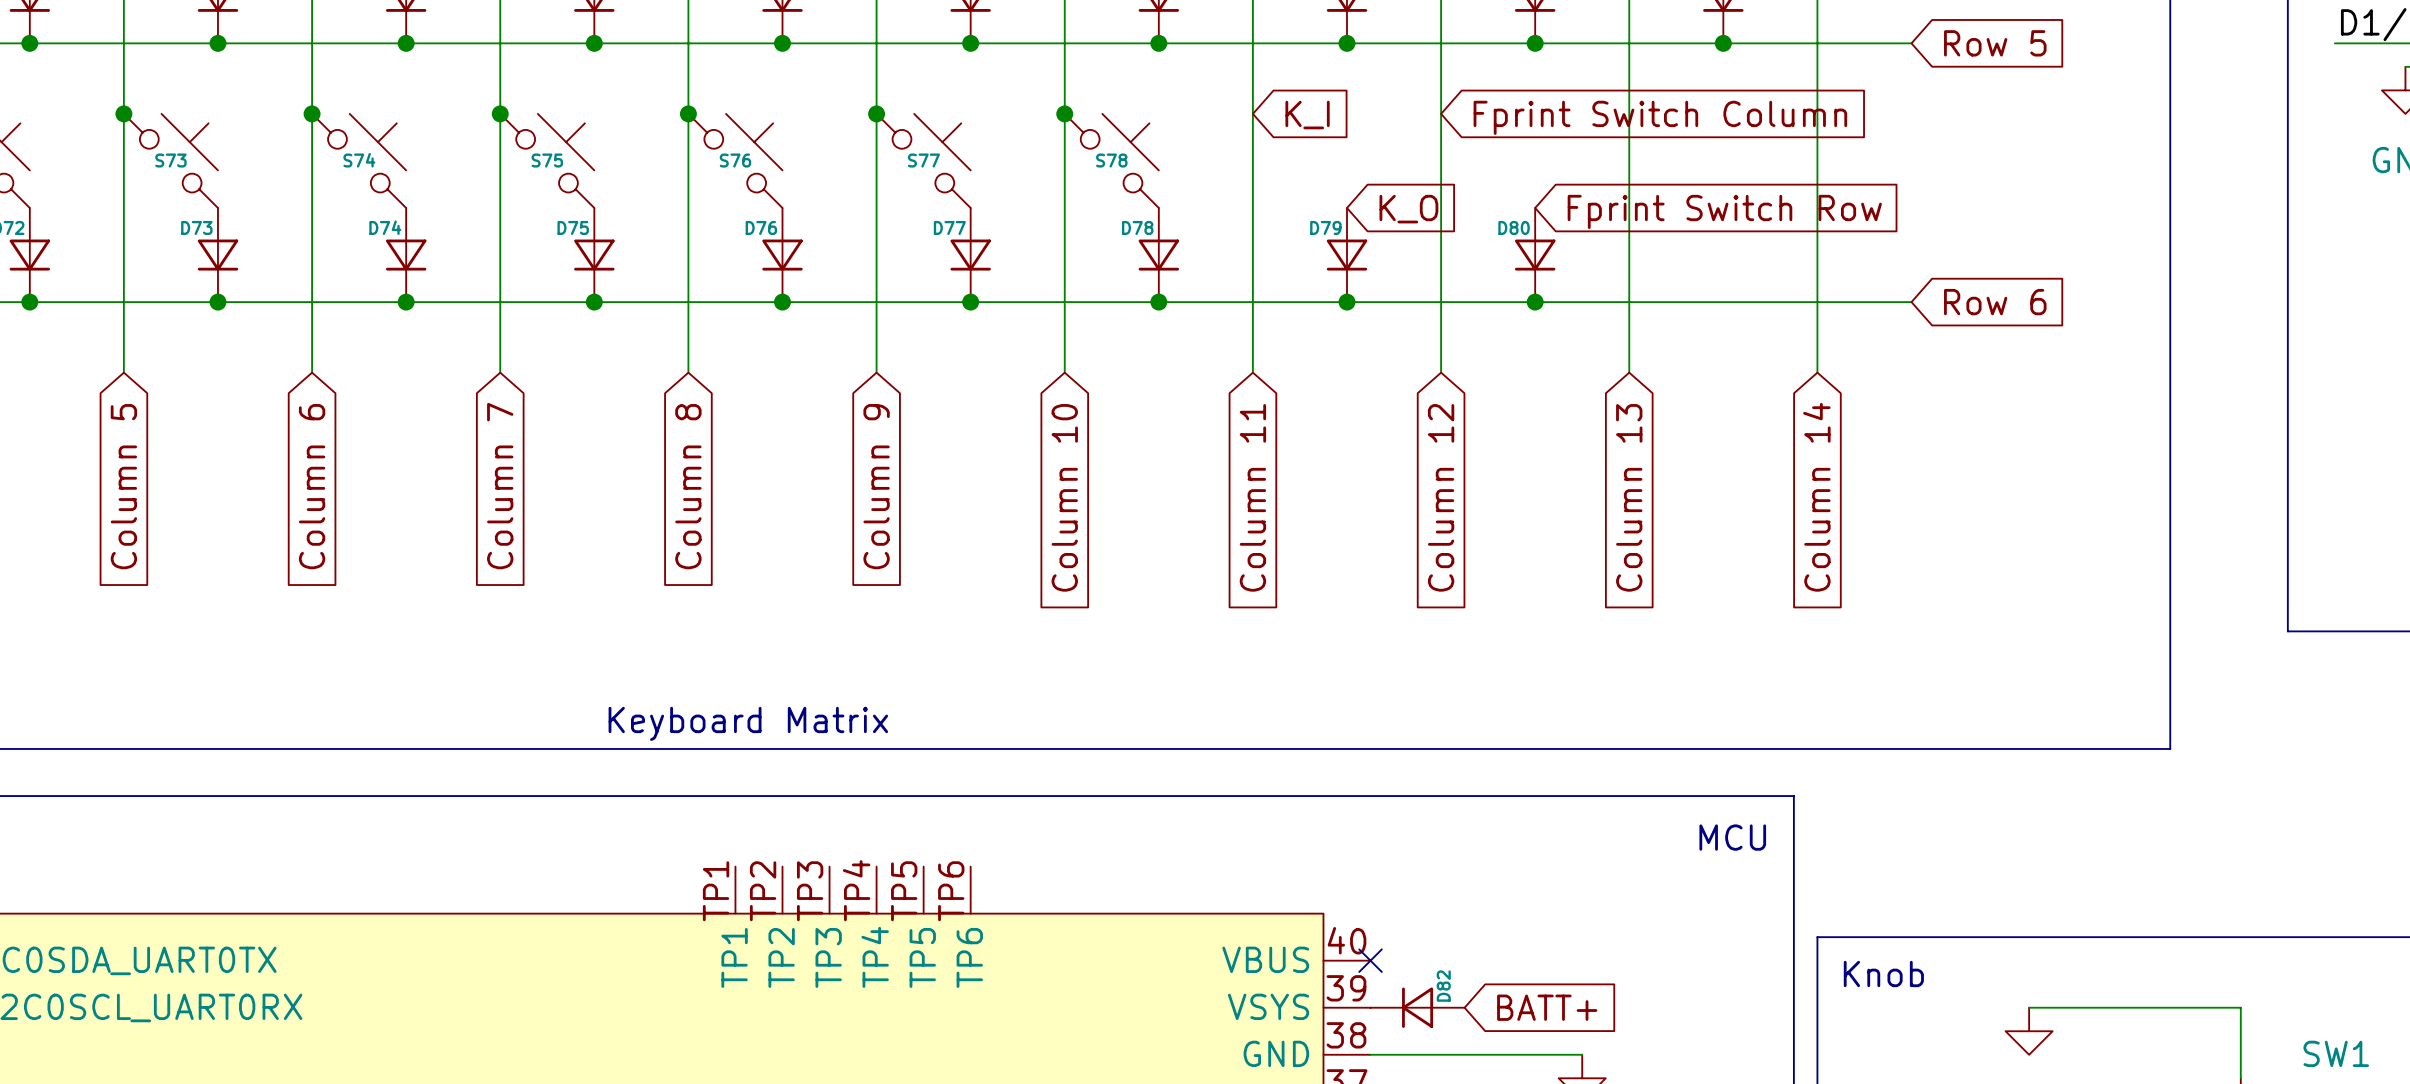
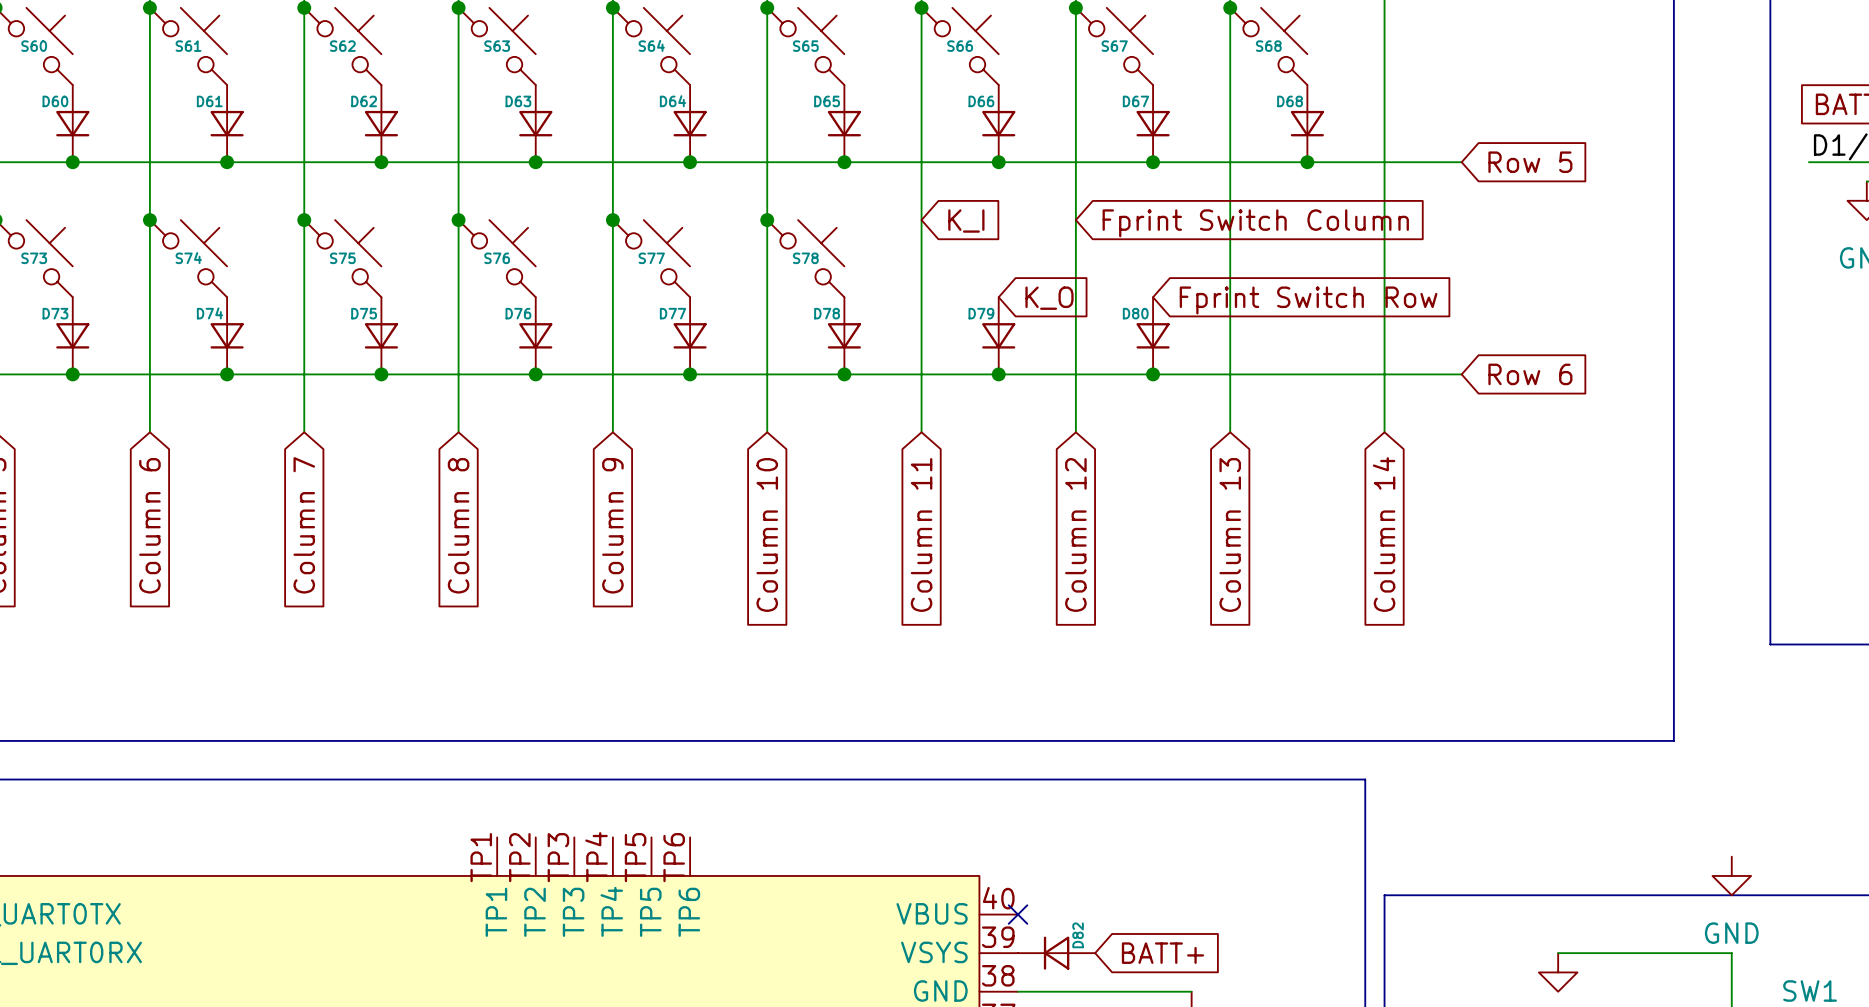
text: Keyboard Matrix (748, 723) -> none
text: MCU (1732, 837) -> none
power symbol: none -> GND (1731, 875)
text: Knob (1883, 973) -> none

